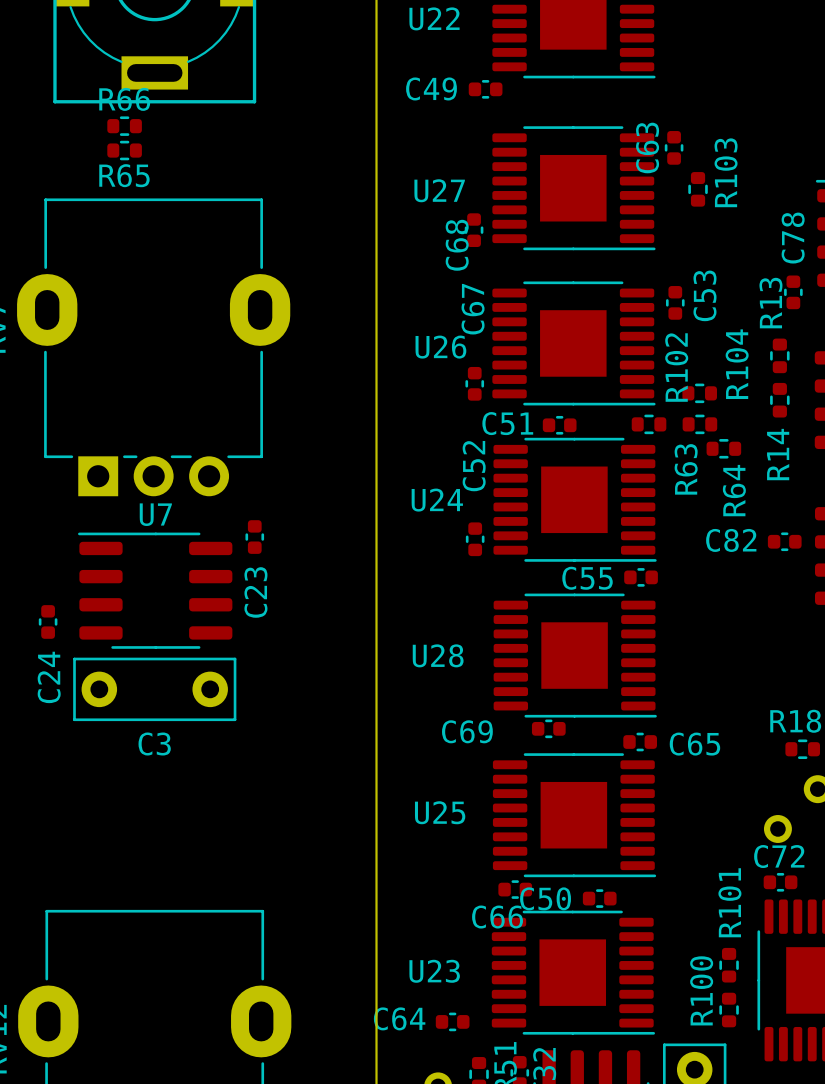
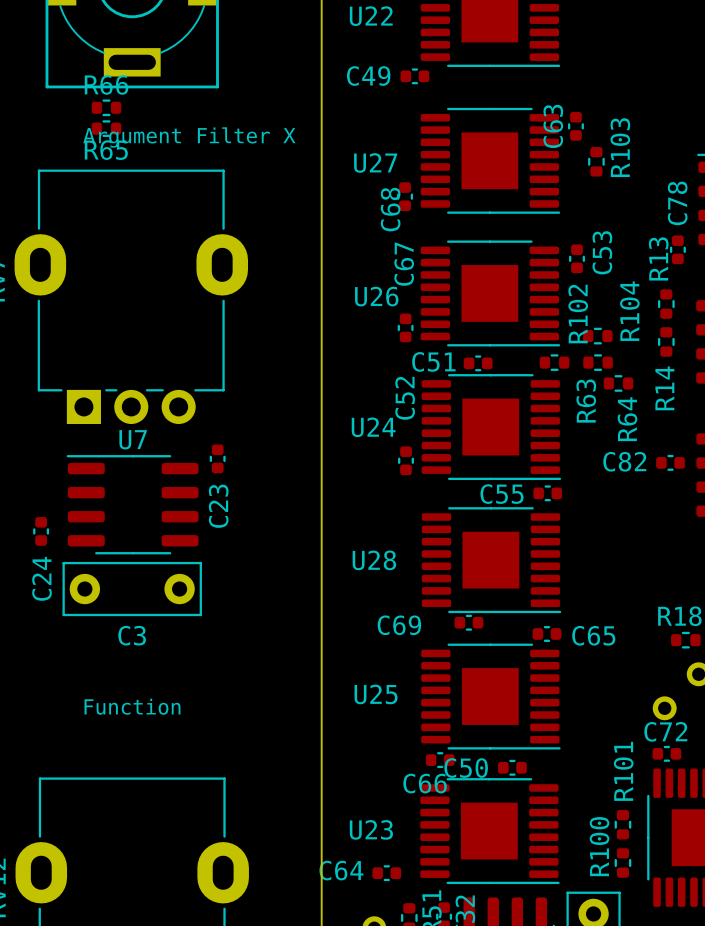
text: none -> Argument Filter X (189, 137)
text: none -> Function (132, 706)

